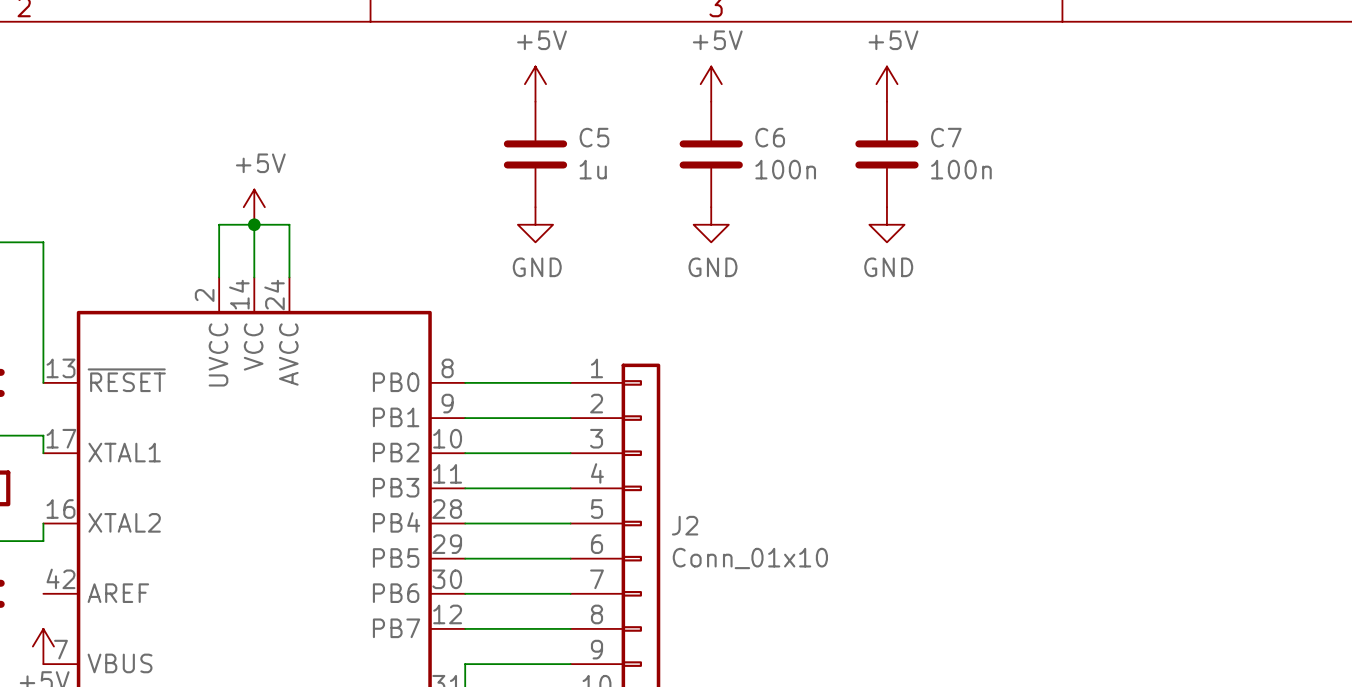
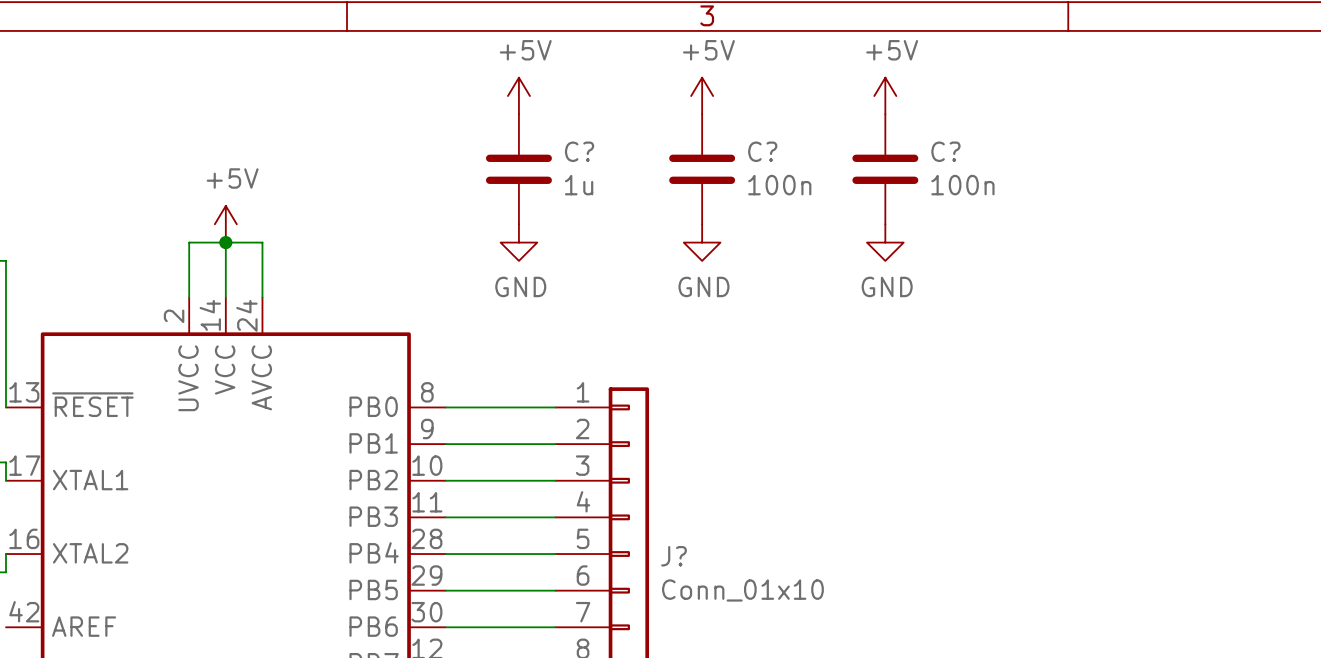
C5 name: C5 (594, 137) -> C? (579, 151)
C6 name: C6 (770, 137) -> C? (762, 151)
C7 name: C7 (946, 137) -> C? (945, 151)
J2 name: J2 (685, 525) -> J? (674, 556)

